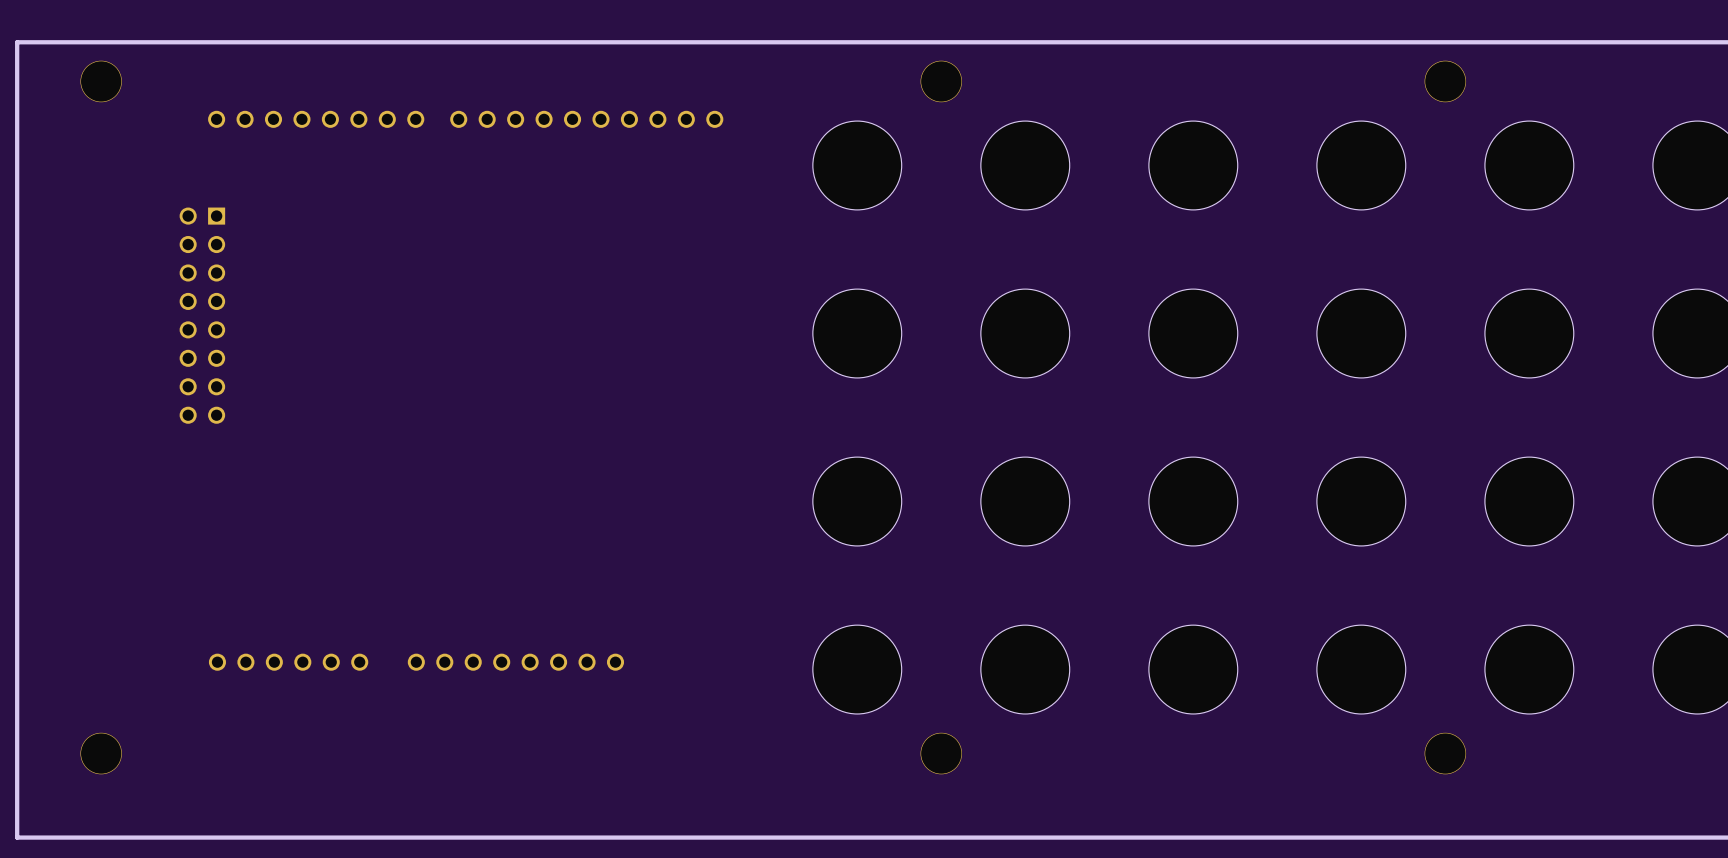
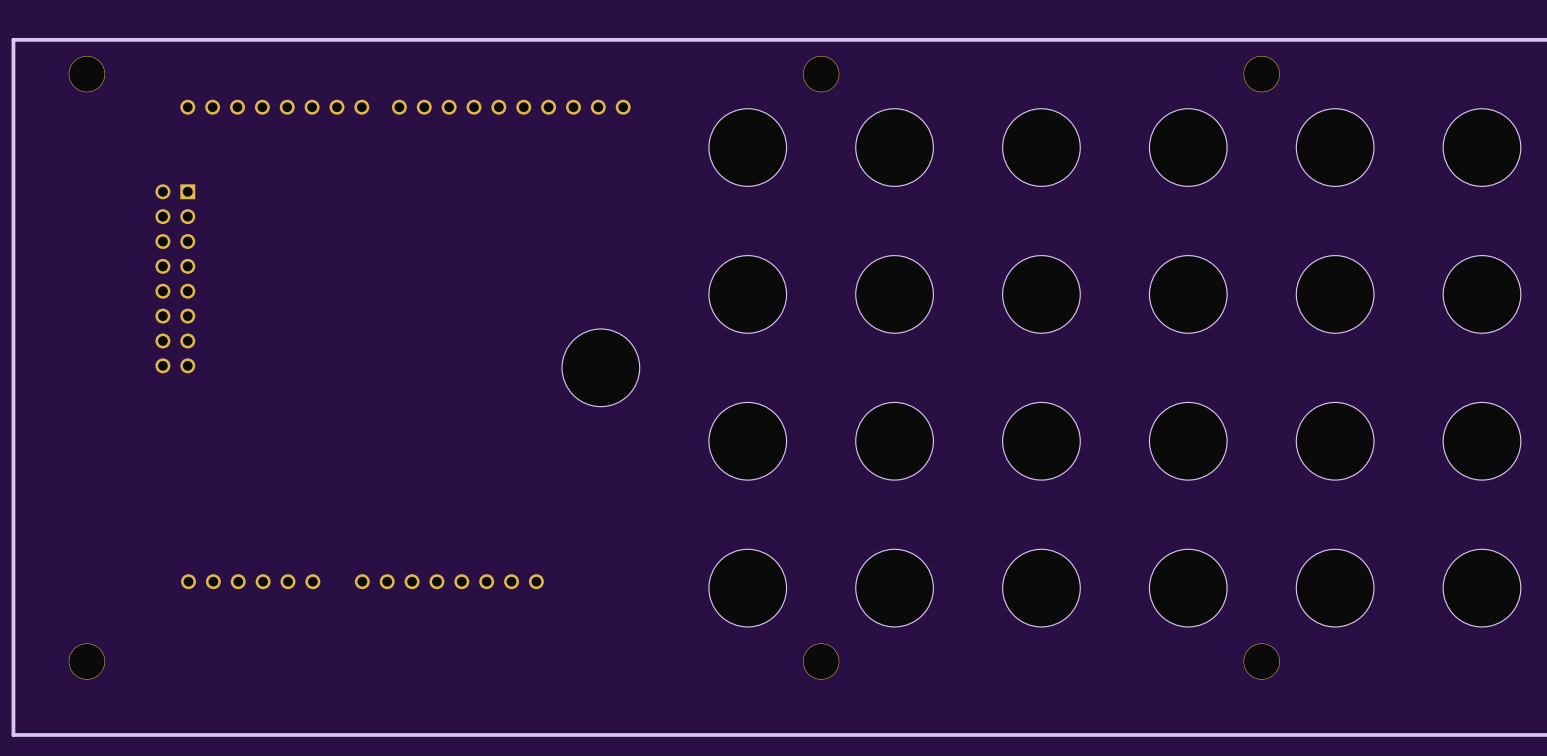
part: none -> (600, 367)

